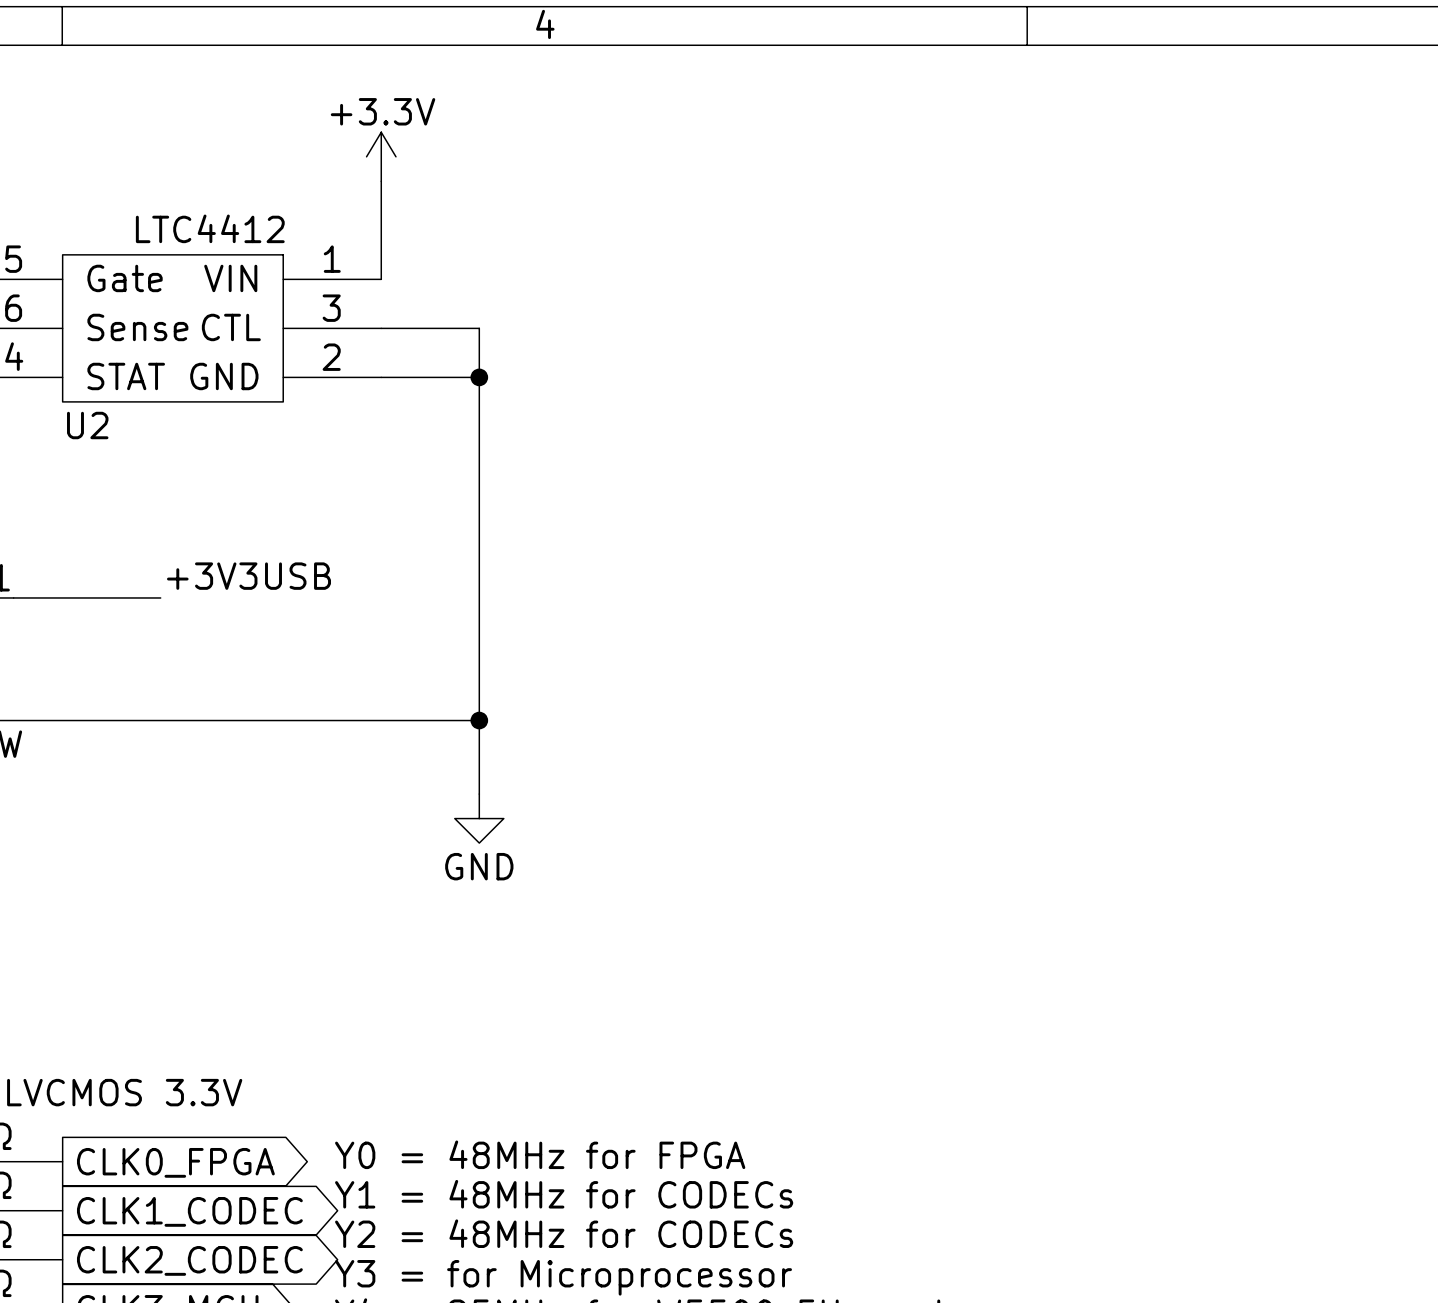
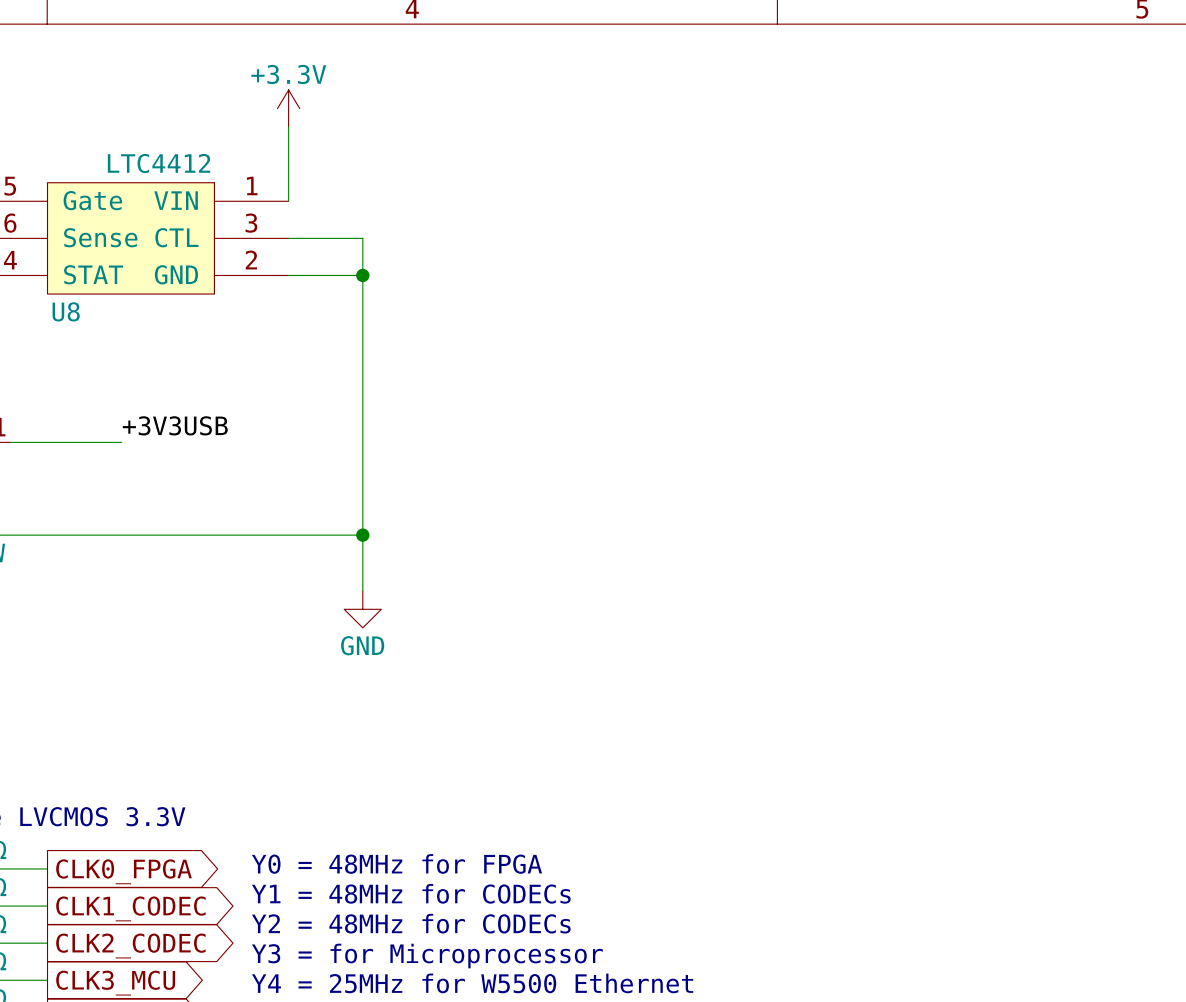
U2 name: U2 (87, 425) -> U8 (66, 311)

